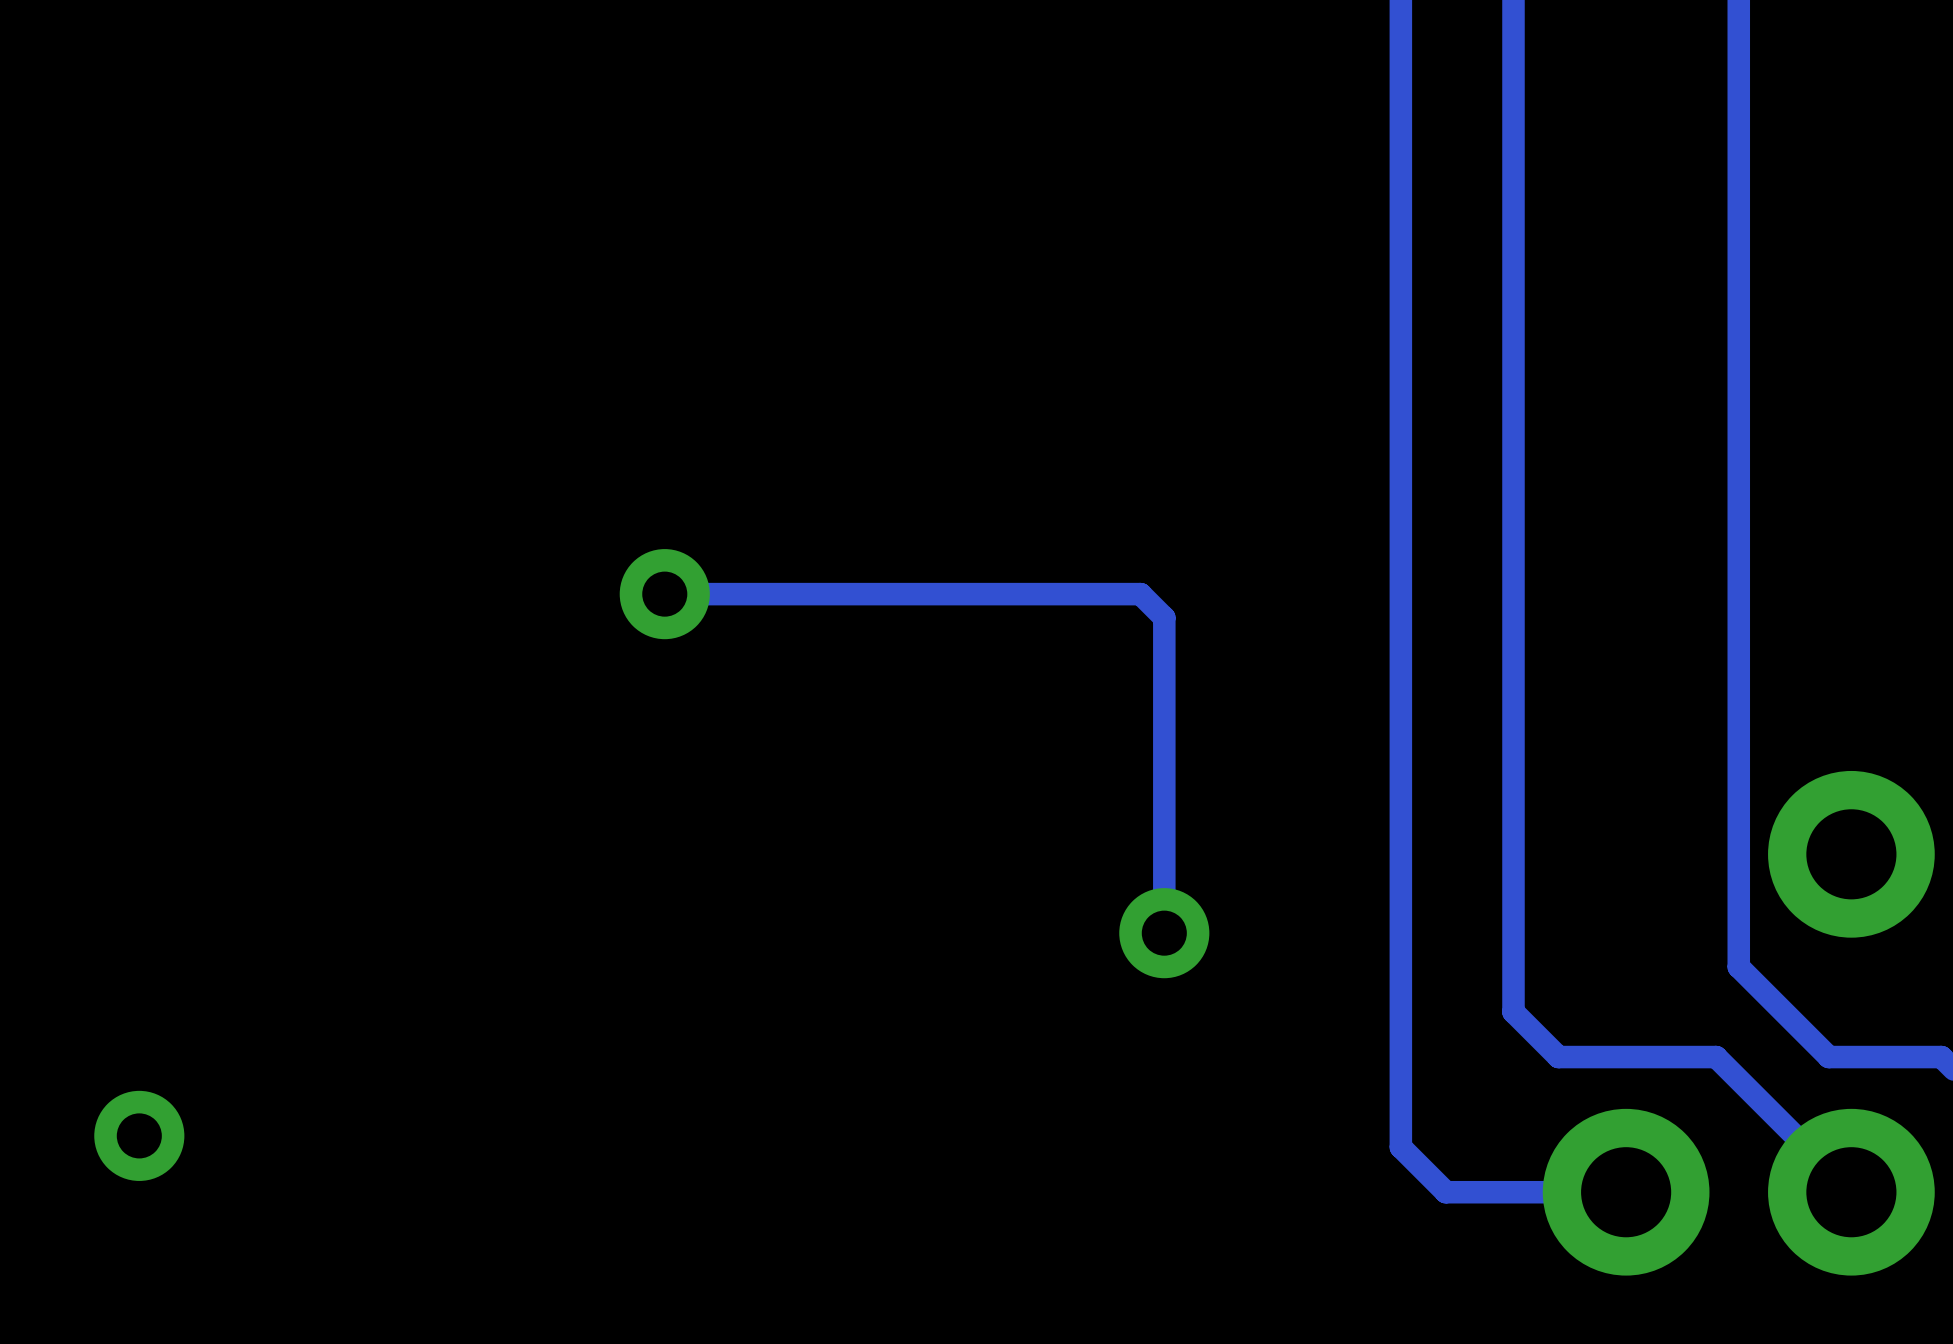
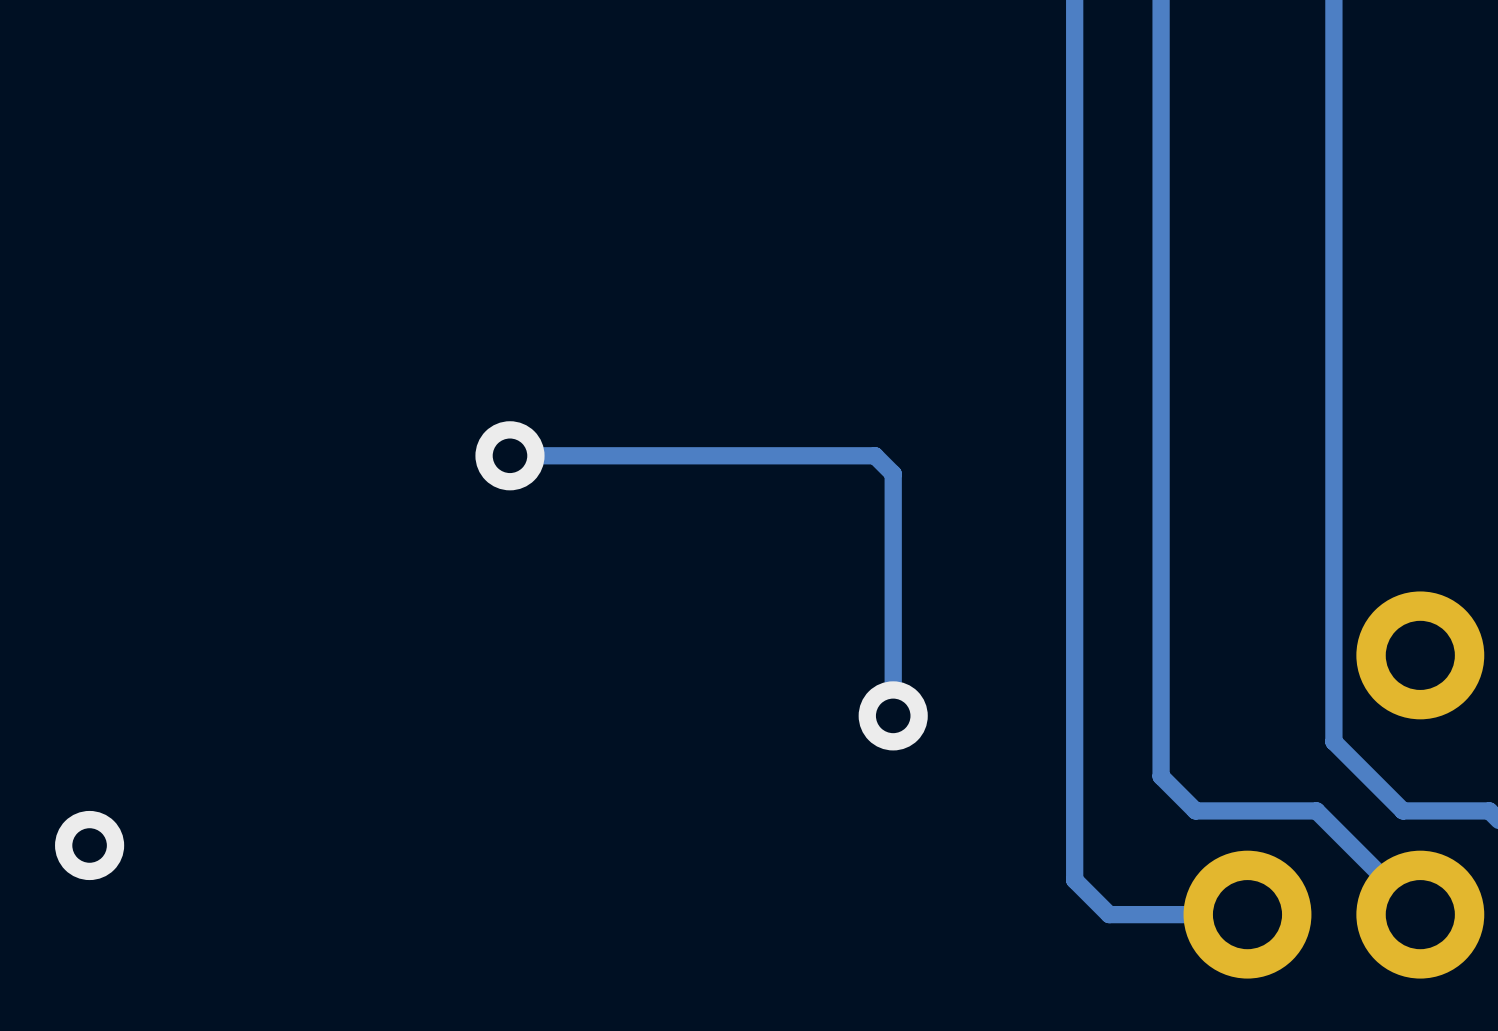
via position: (139, 1135) -> (89, 845)

